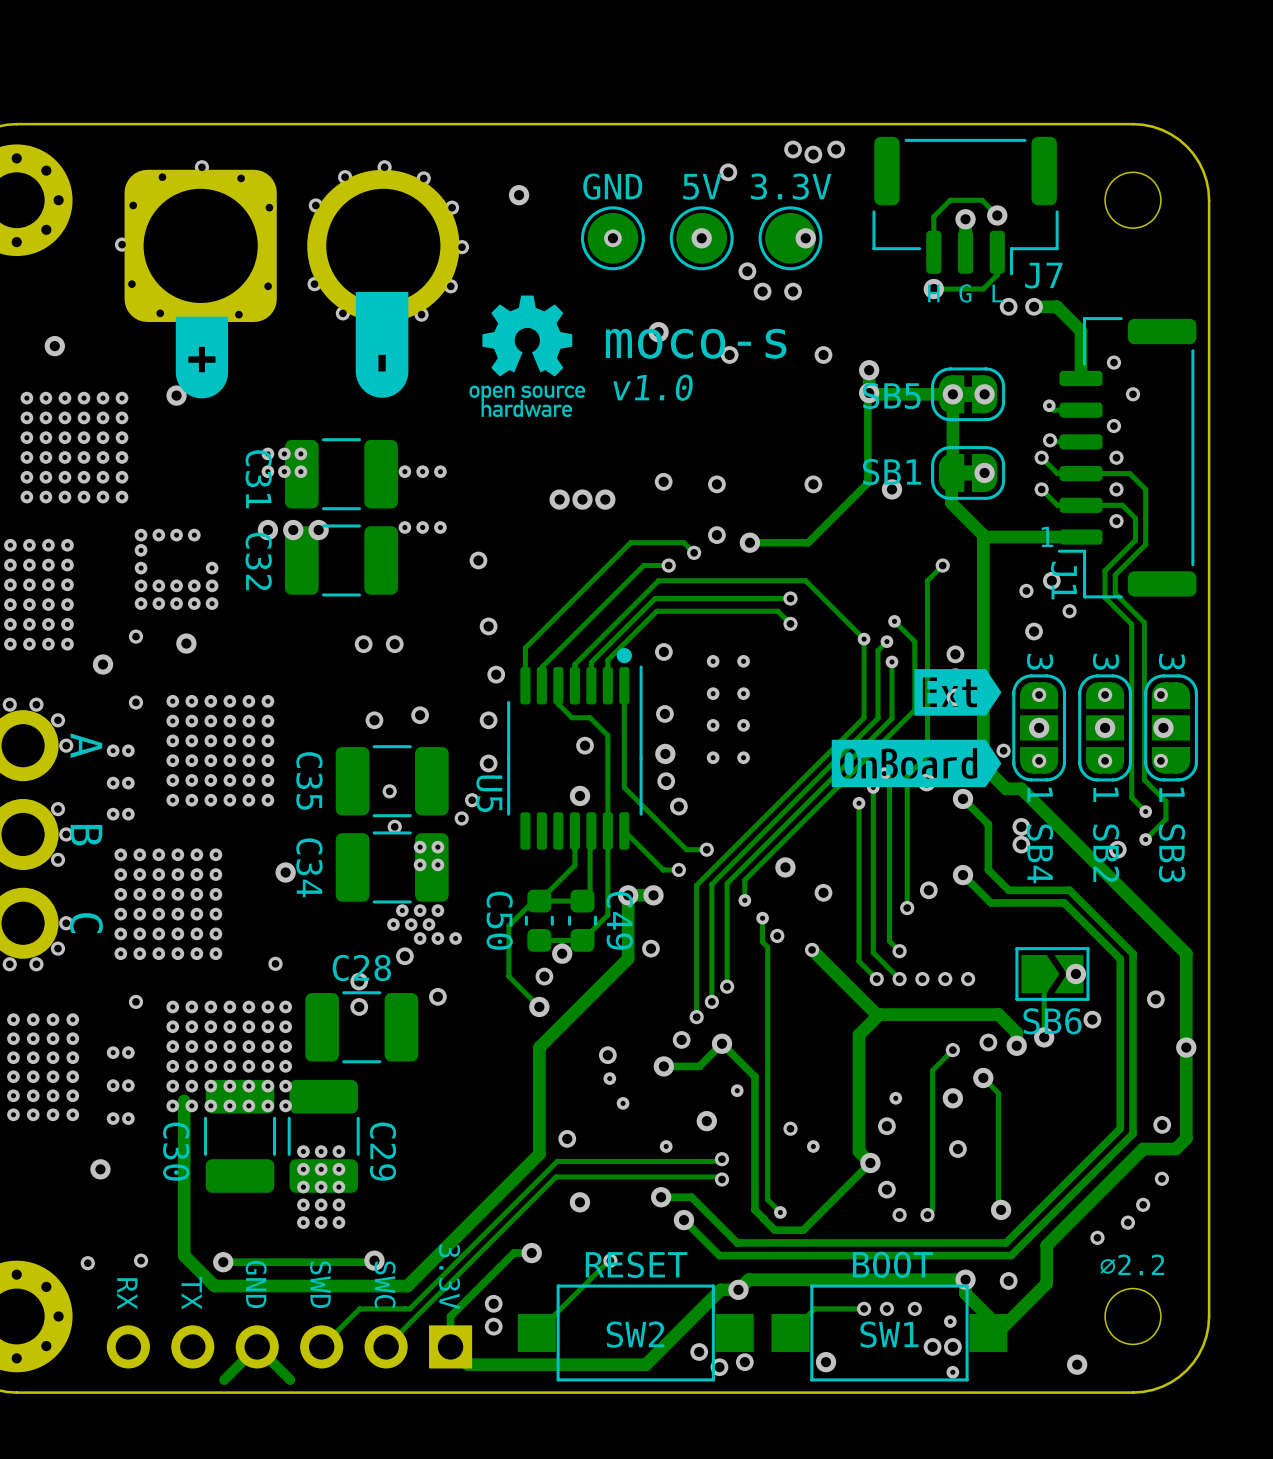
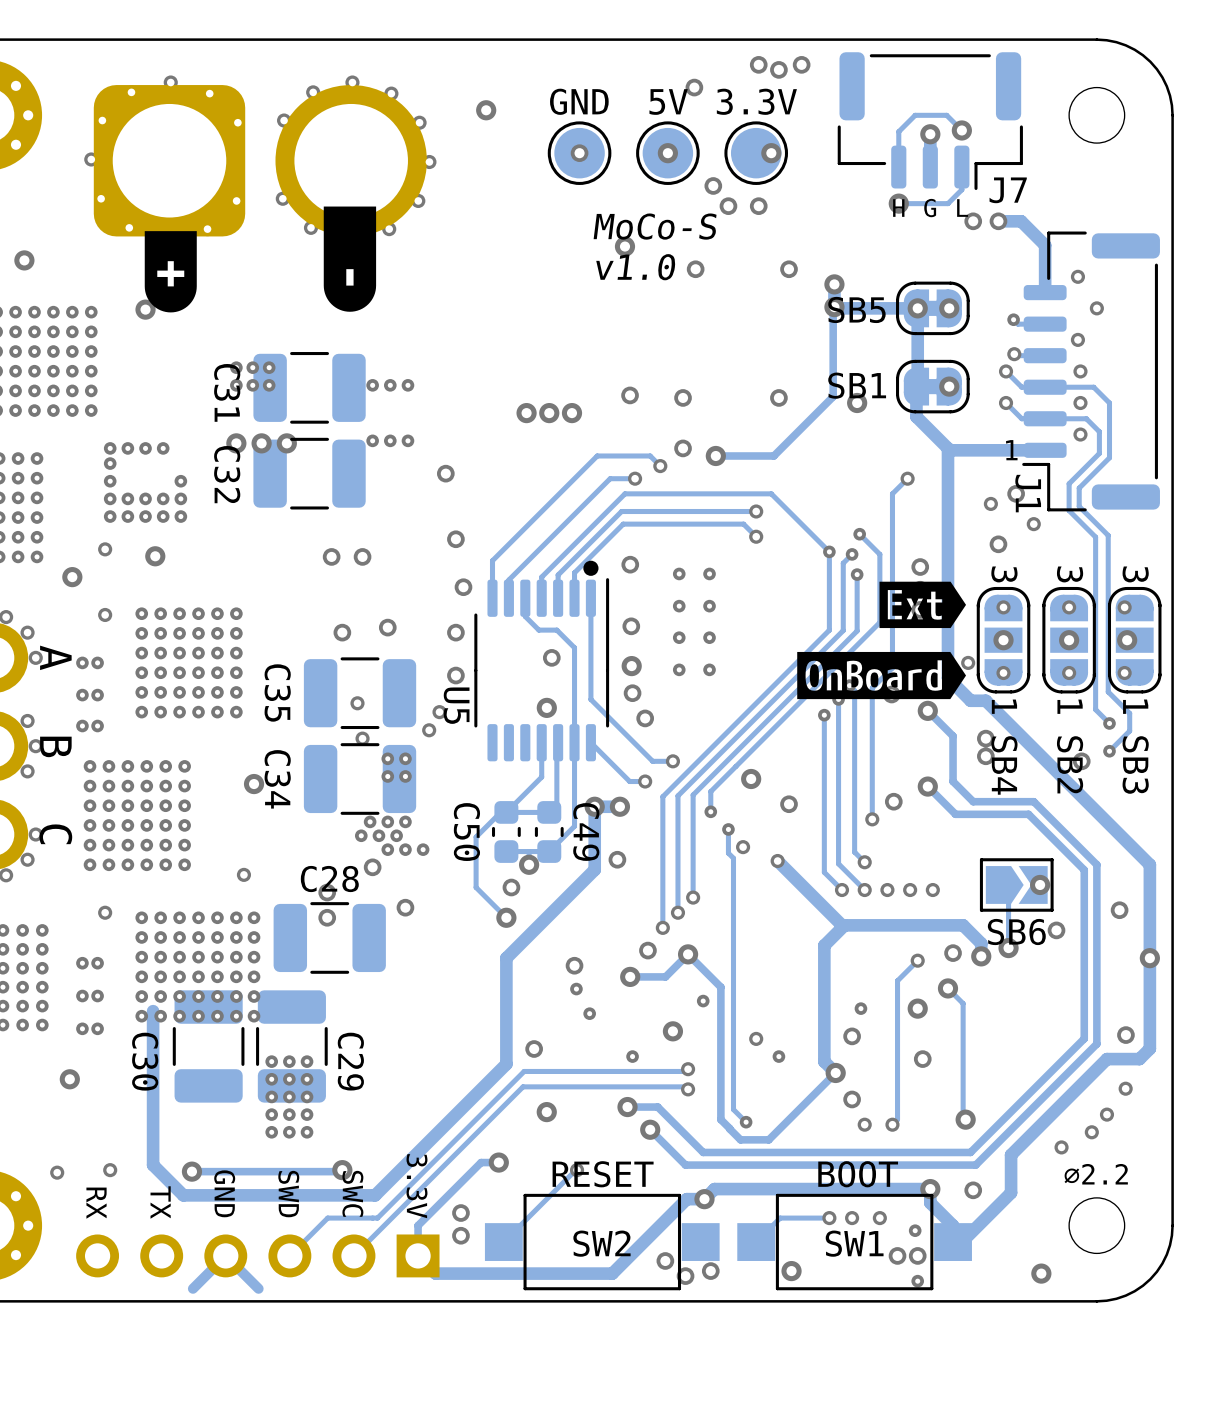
drawing: [469, 295, 586, 418] -> none
text: none -> MoCo-S (655, 226)
text: moco-s (696, 343) -> none
text position: v1.0 (653, 387) -> v1.0 (635, 267)

